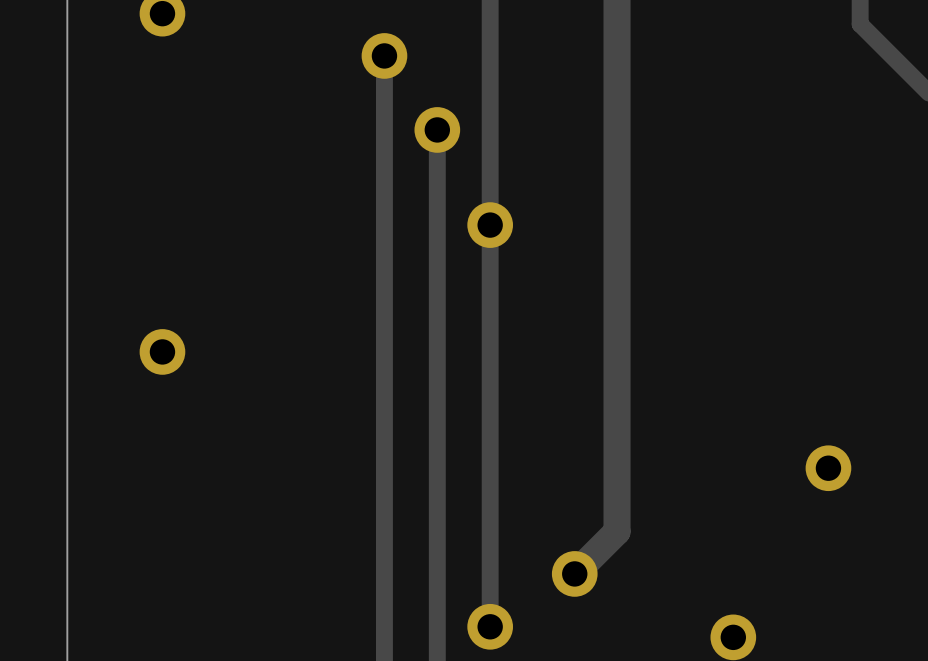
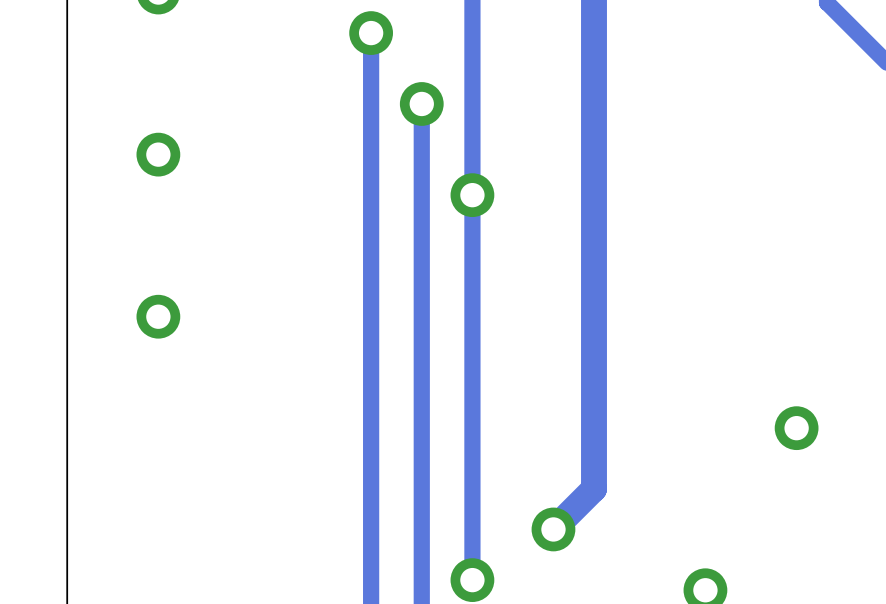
via: none -> (158, 154)

